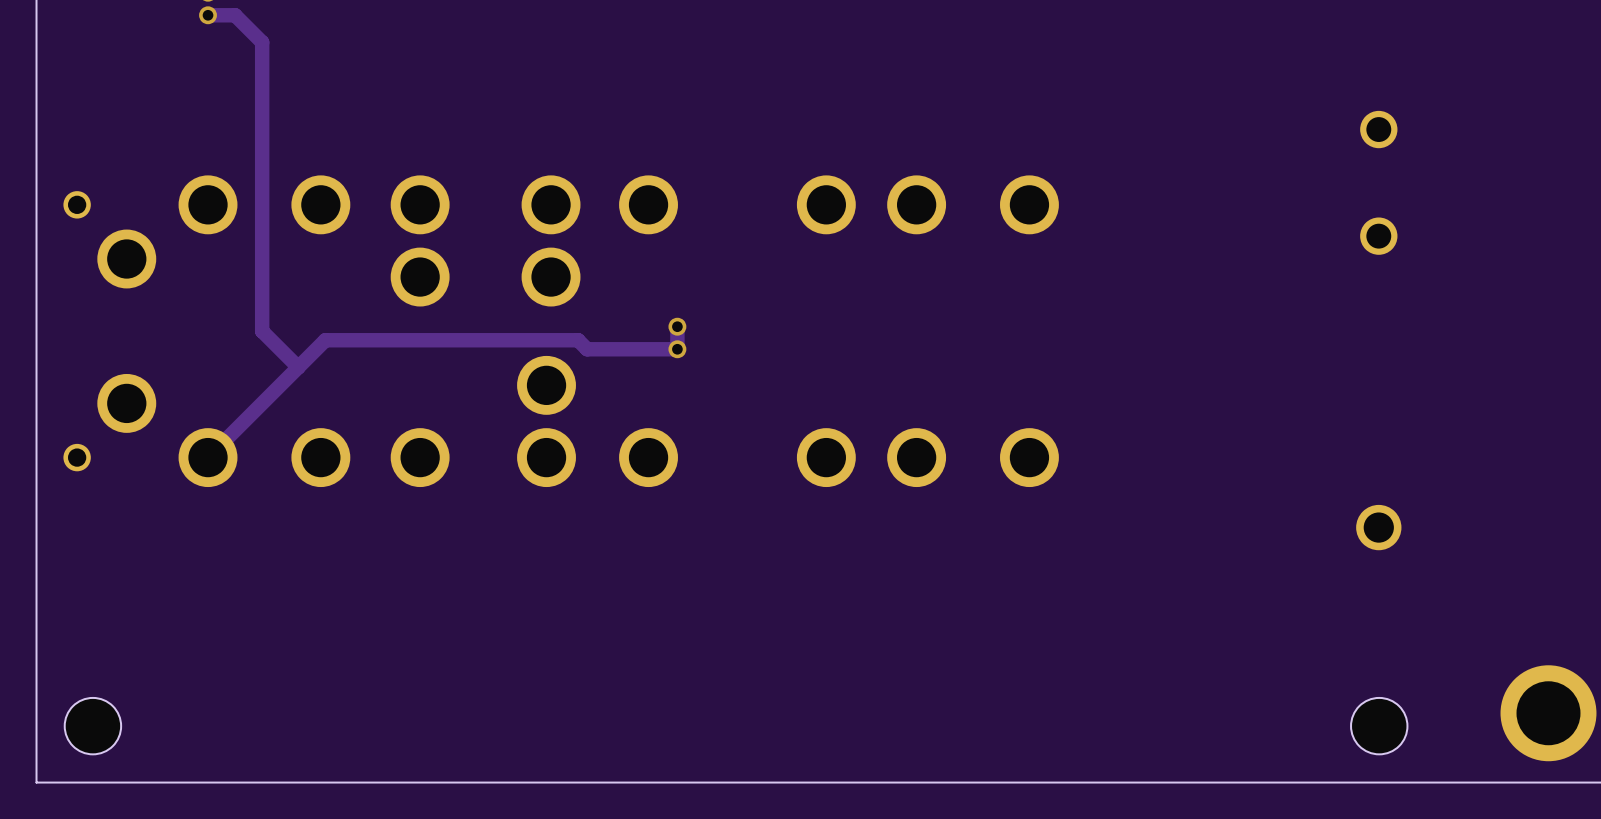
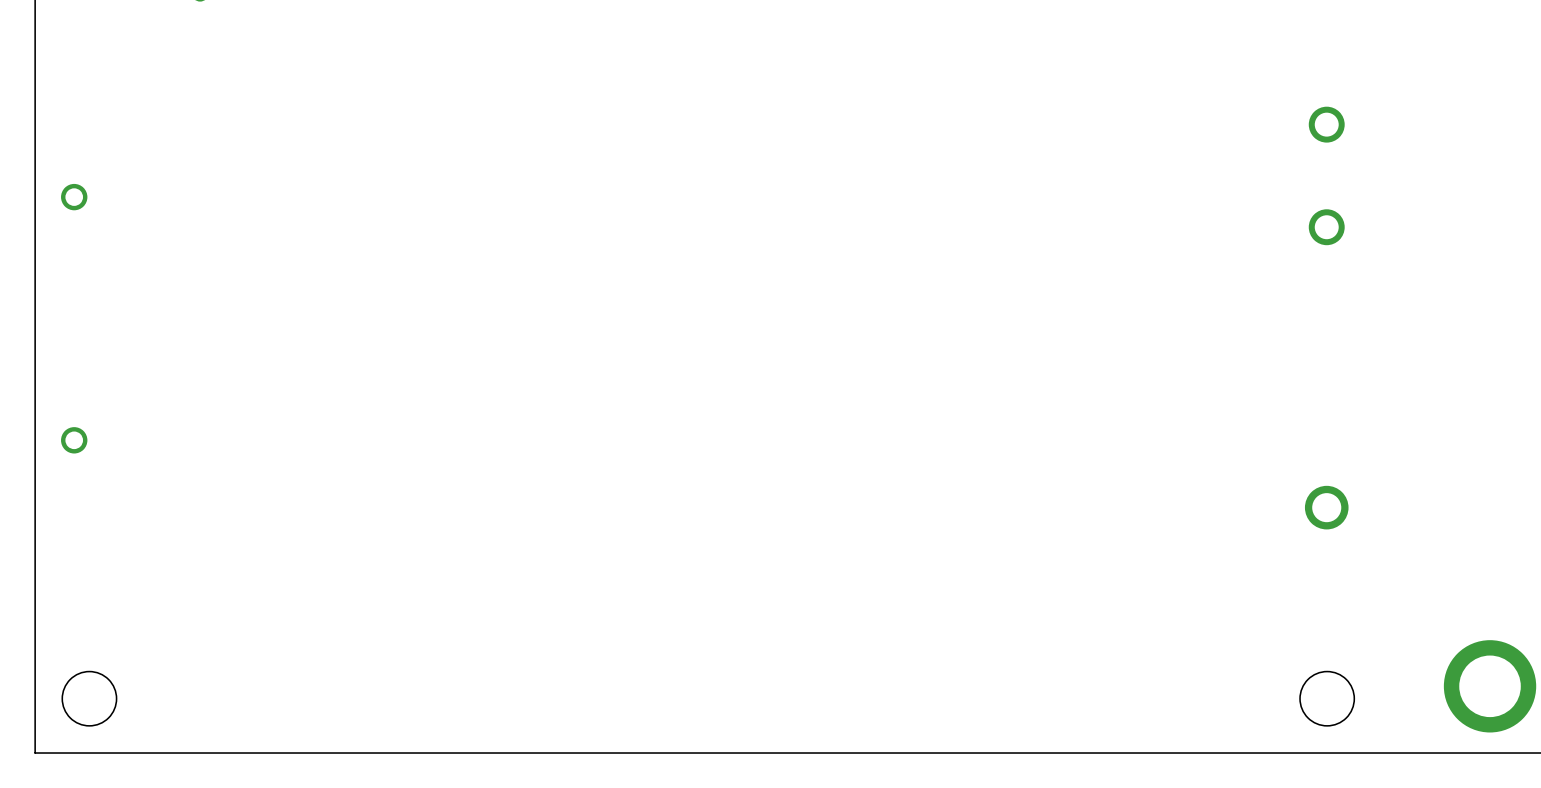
track: (208, 15) (235, 15) (262, 42) (262, 331) (298, 367) -> none
via: (208, 15) -> none
part: (208, 204) -> none
part: (320, 204) -> none
part: (420, 204) -> none
part: (551, 204) -> none
part: (648, 204) -> none
part: (826, 204) -> none
part: (916, 204) -> none
part: (1029, 204) -> none
part: (126, 259) -> none
part: (420, 277) -> none
part: (551, 277) -> none
track: (677, 326) (677, 349) (587, 349) (578, 340) (325, 340) (208, 457) -> none
via: (677, 326) -> none
via: (677, 349) -> none
part: (546, 385) -> none
part: (126, 403) -> none
part: (208, 457) -> none
part: (320, 457) -> none
part: (420, 457) -> none
part: (546, 457) -> none
part: (648, 457) -> none
part: (826, 457) -> none
part: (916, 457) -> none
part: (1029, 457) -> none

